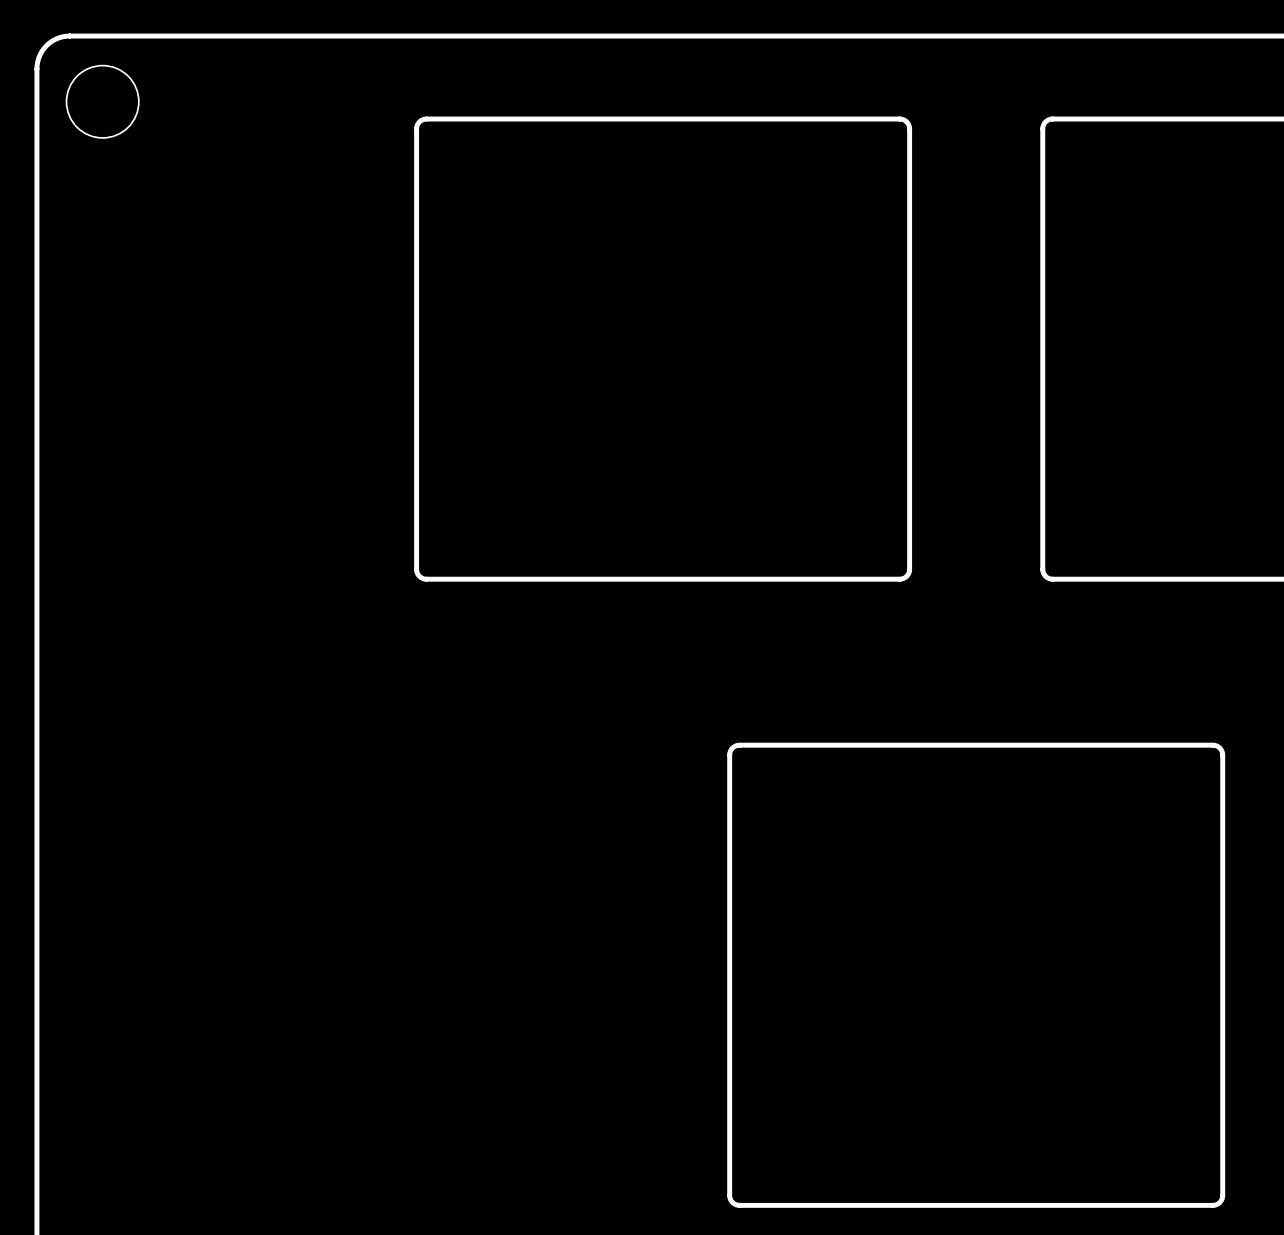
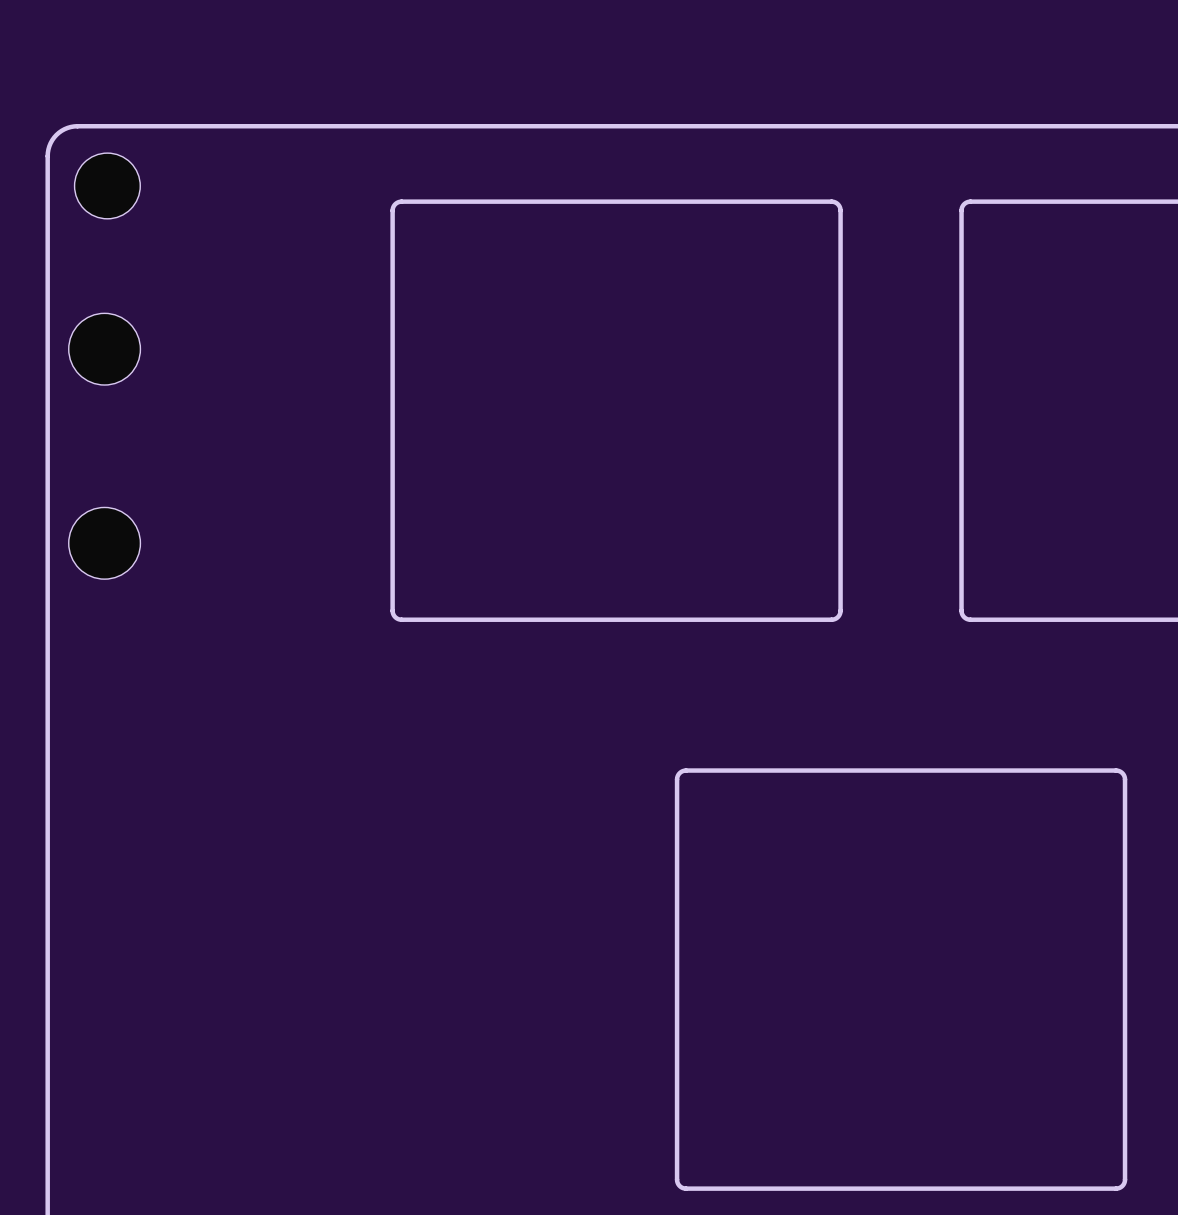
part: none -> (104, 349)
part: none -> (104, 543)

